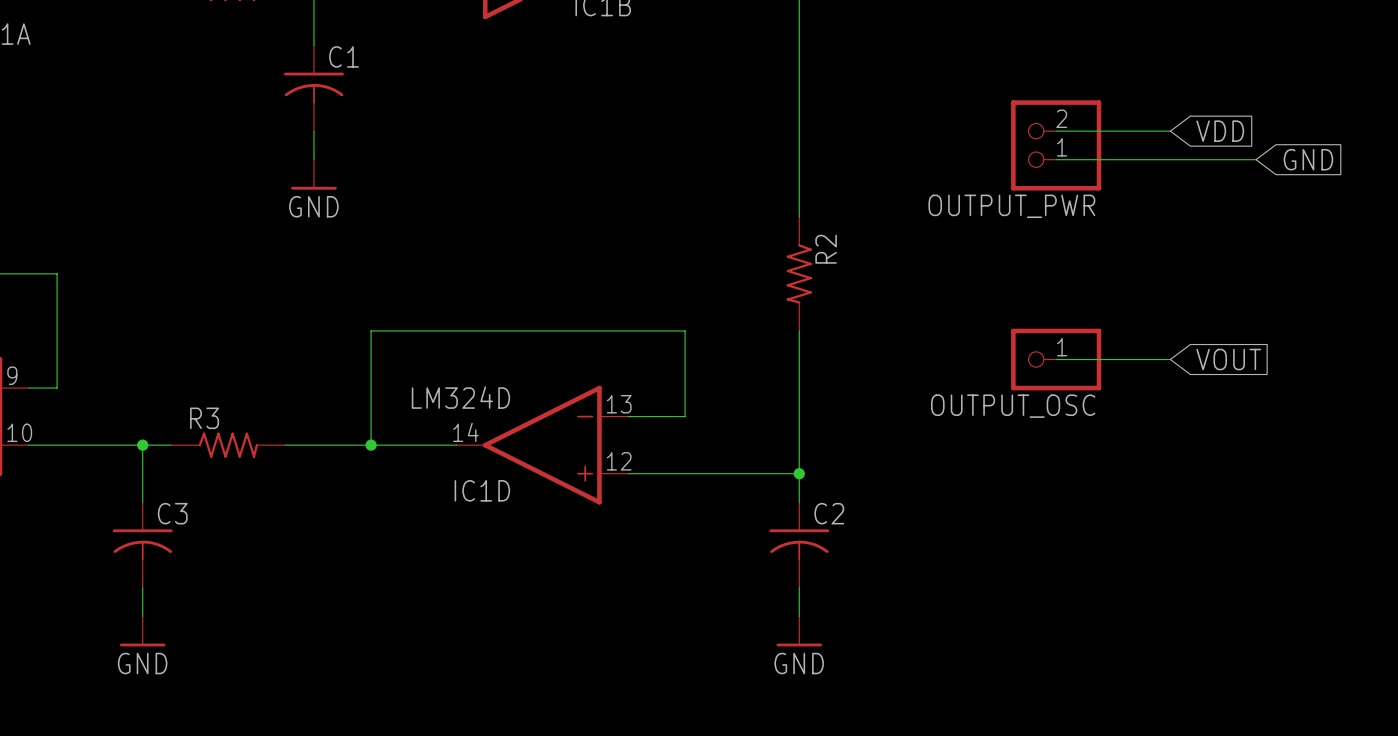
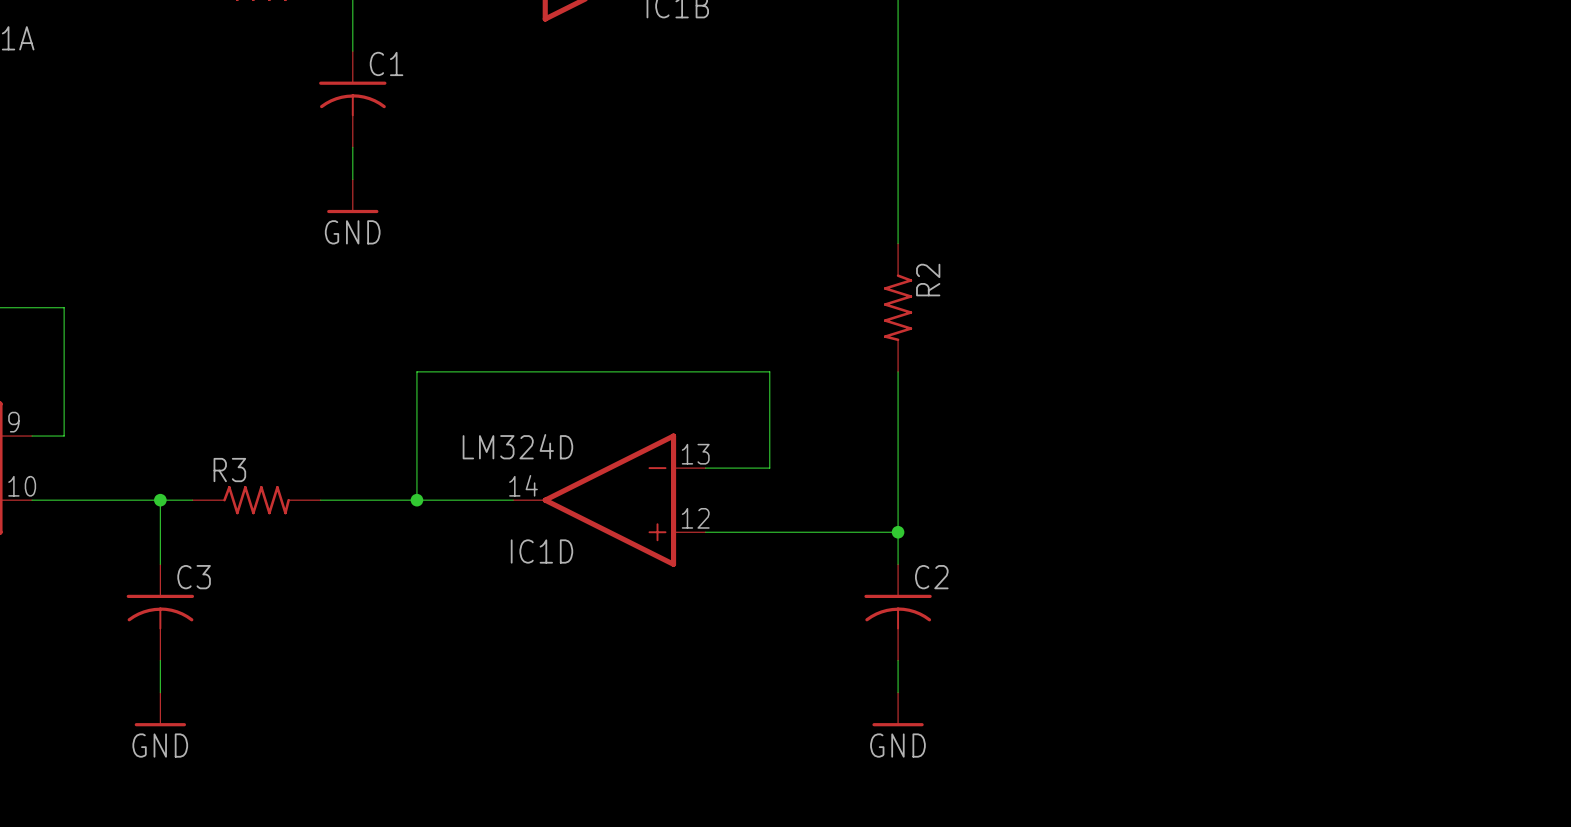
wire: (1056, 131) (1170, 131) -> none
global label: VDD (1220, 131) -> none
OUTPUT_PWR: (1056, 145) -> none
wire: (1056, 159) (1256, 159) -> none
global label: GND (1308, 159) -> none
wire: (1056, 359) (1170, 359) -> none
OUTPUT_OSC: (1056, 359) -> none
global label: VOUT (1228, 359) -> none

